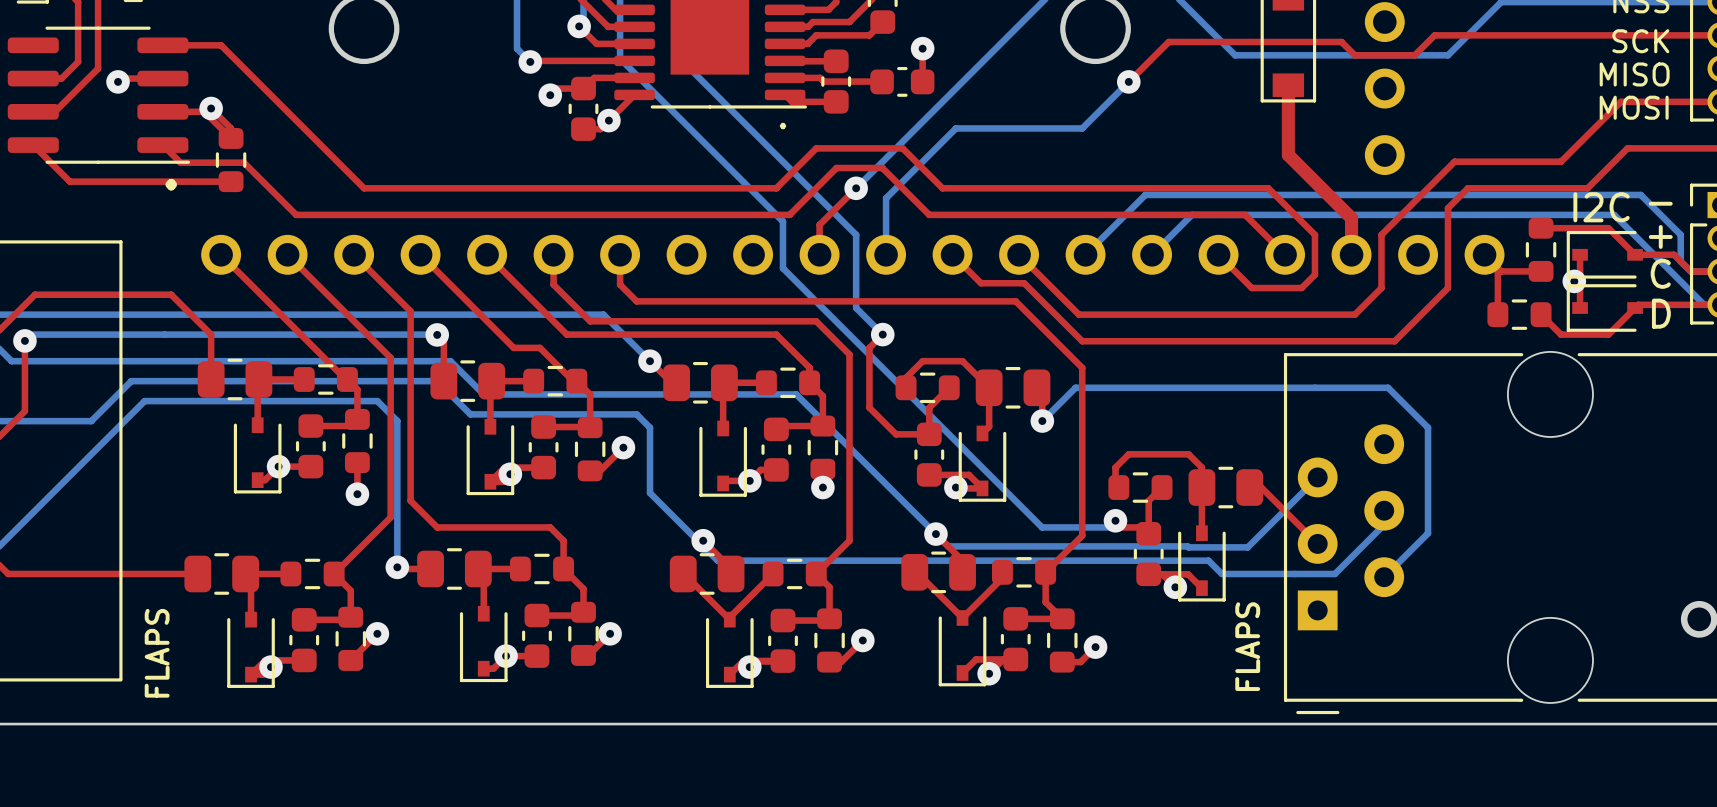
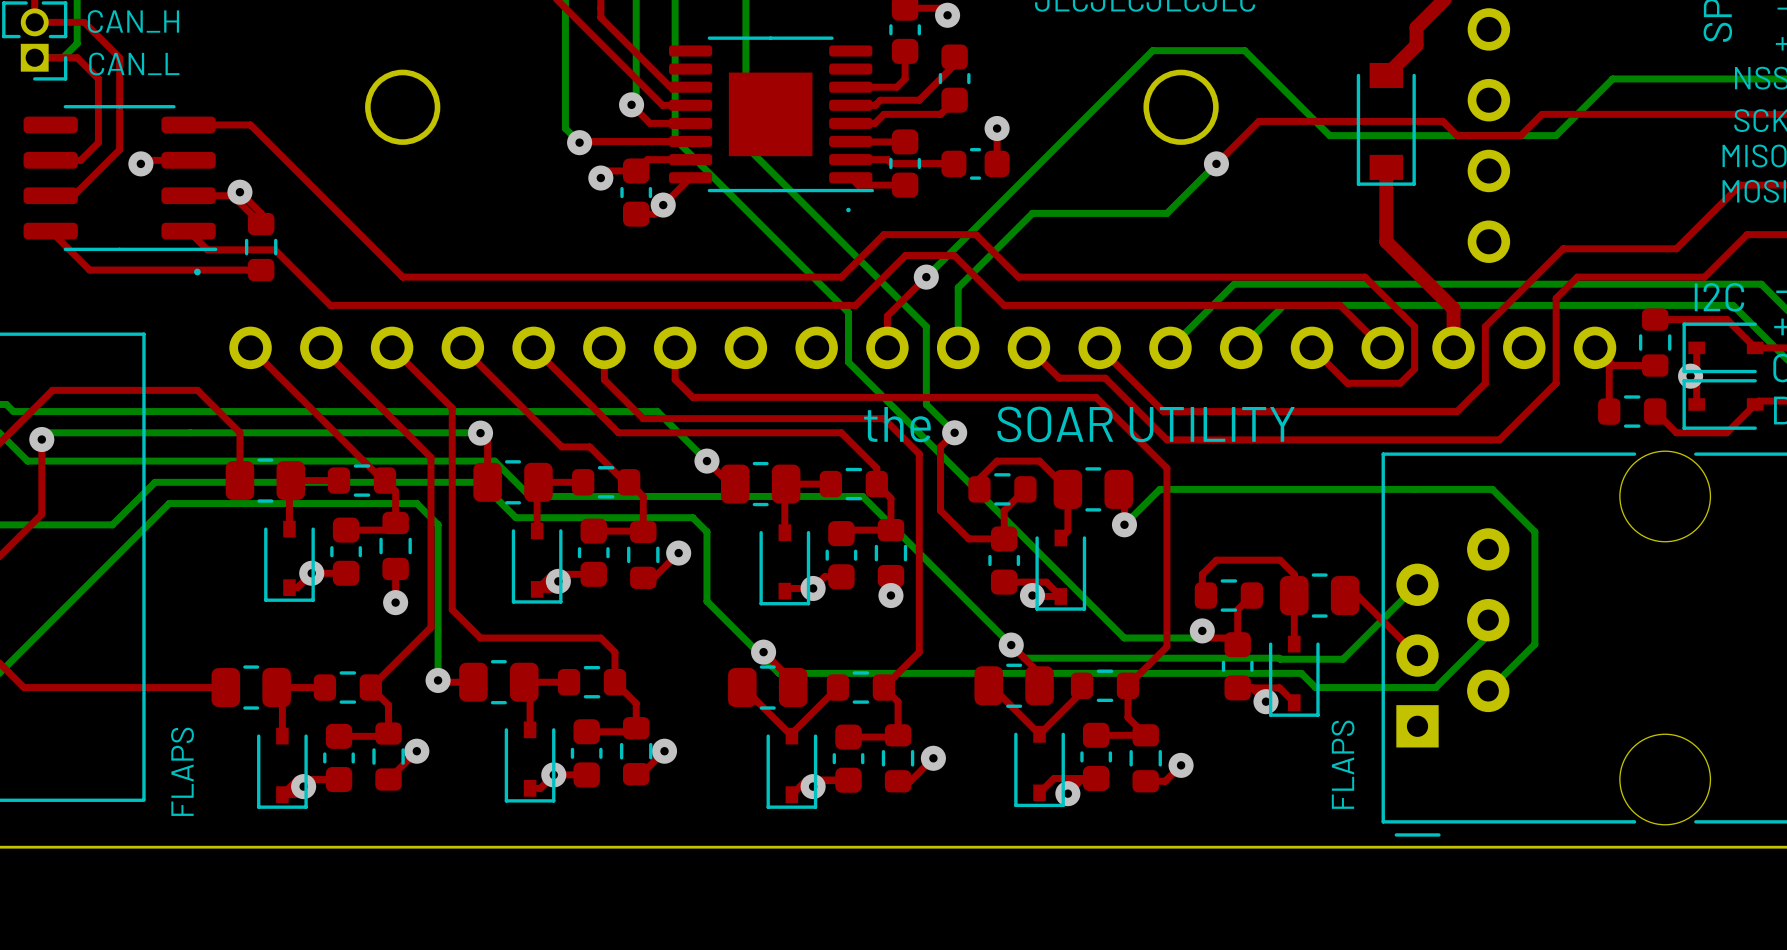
text: none -> the (897, 424)
text: none -> SOAR UTILITY (1146, 424)

